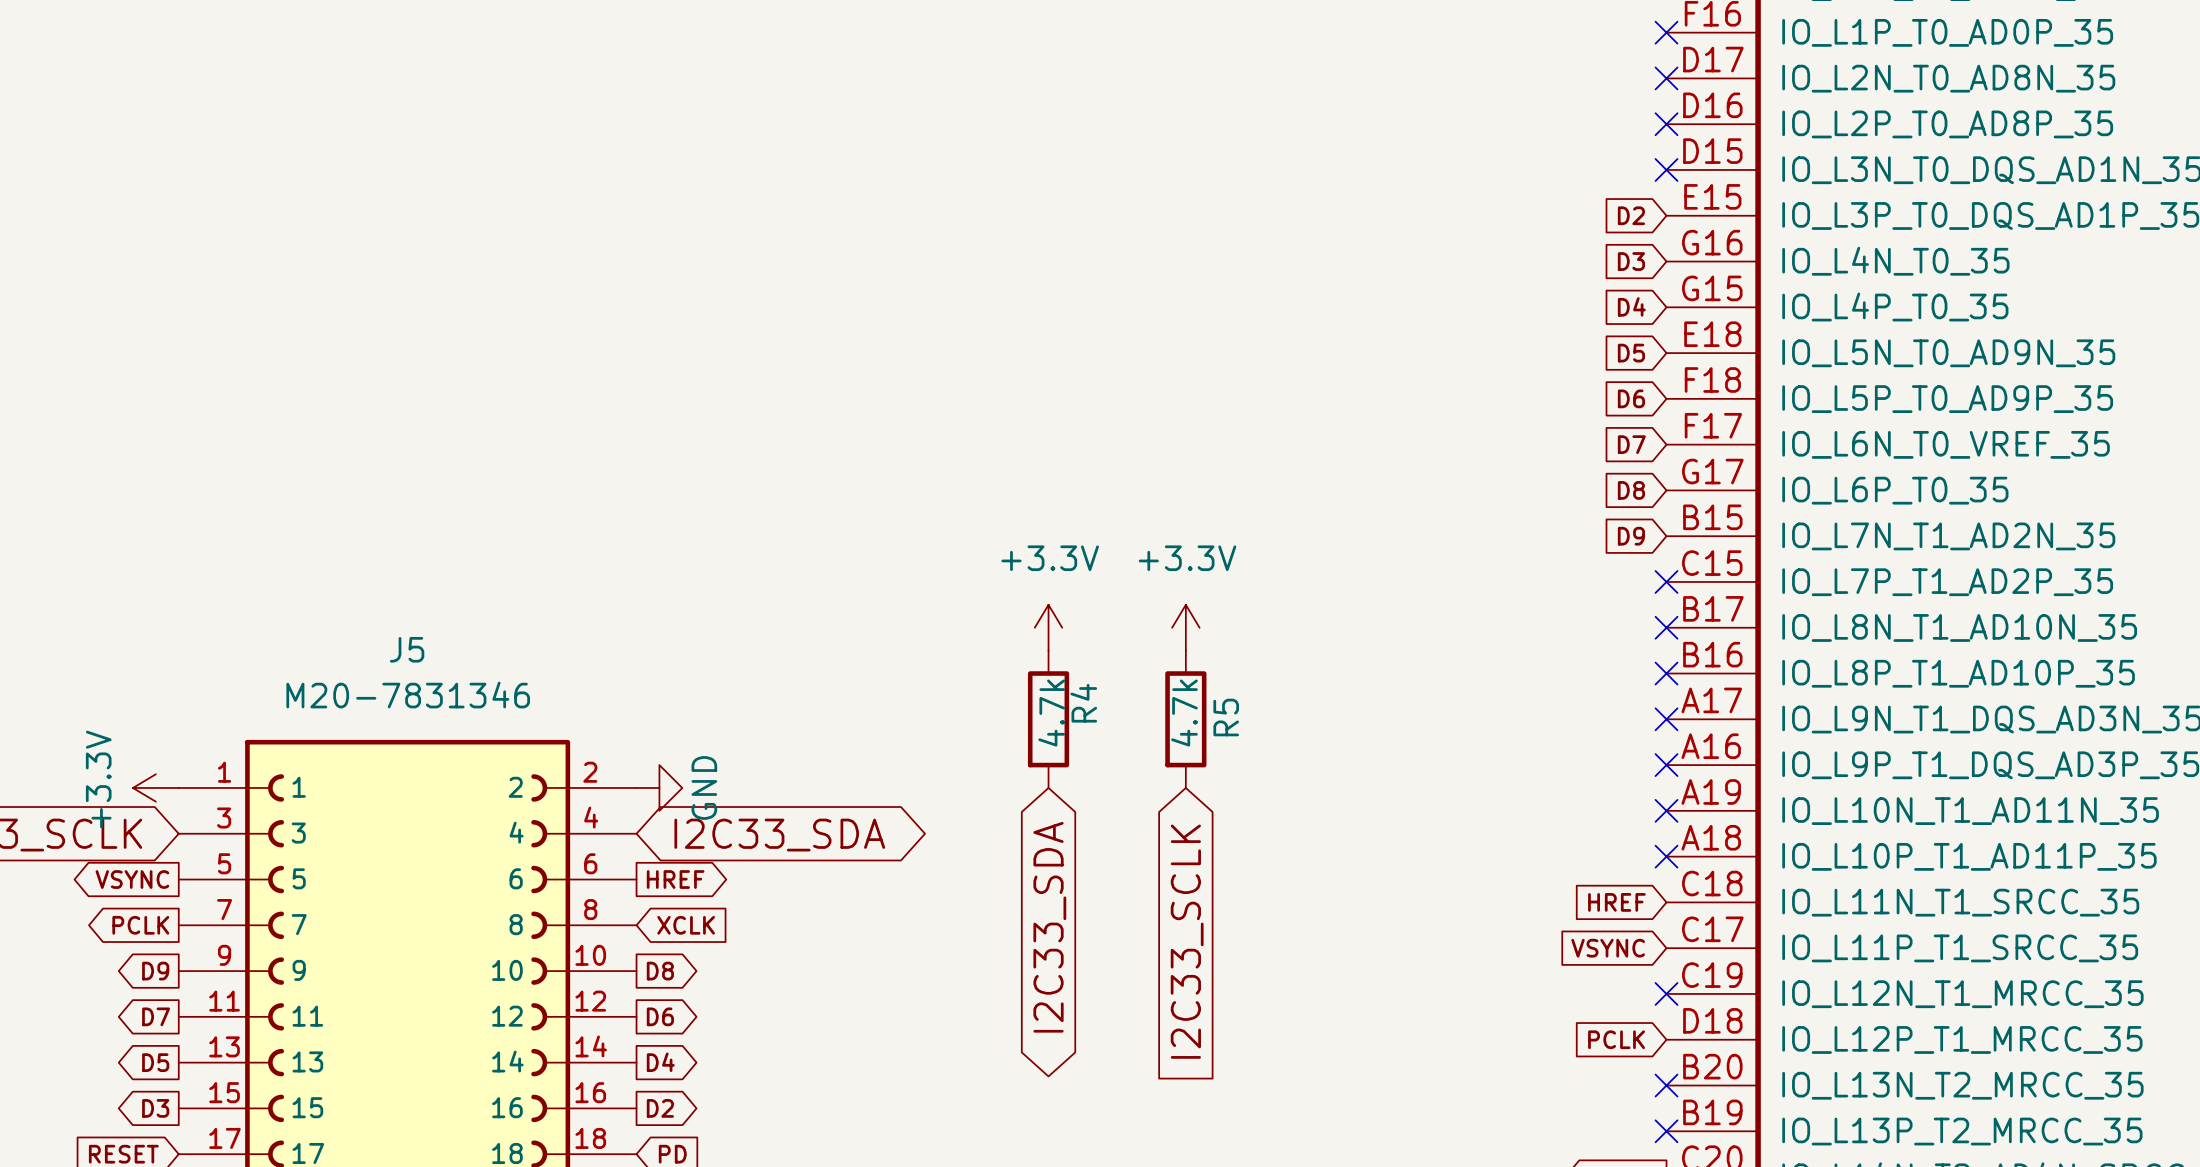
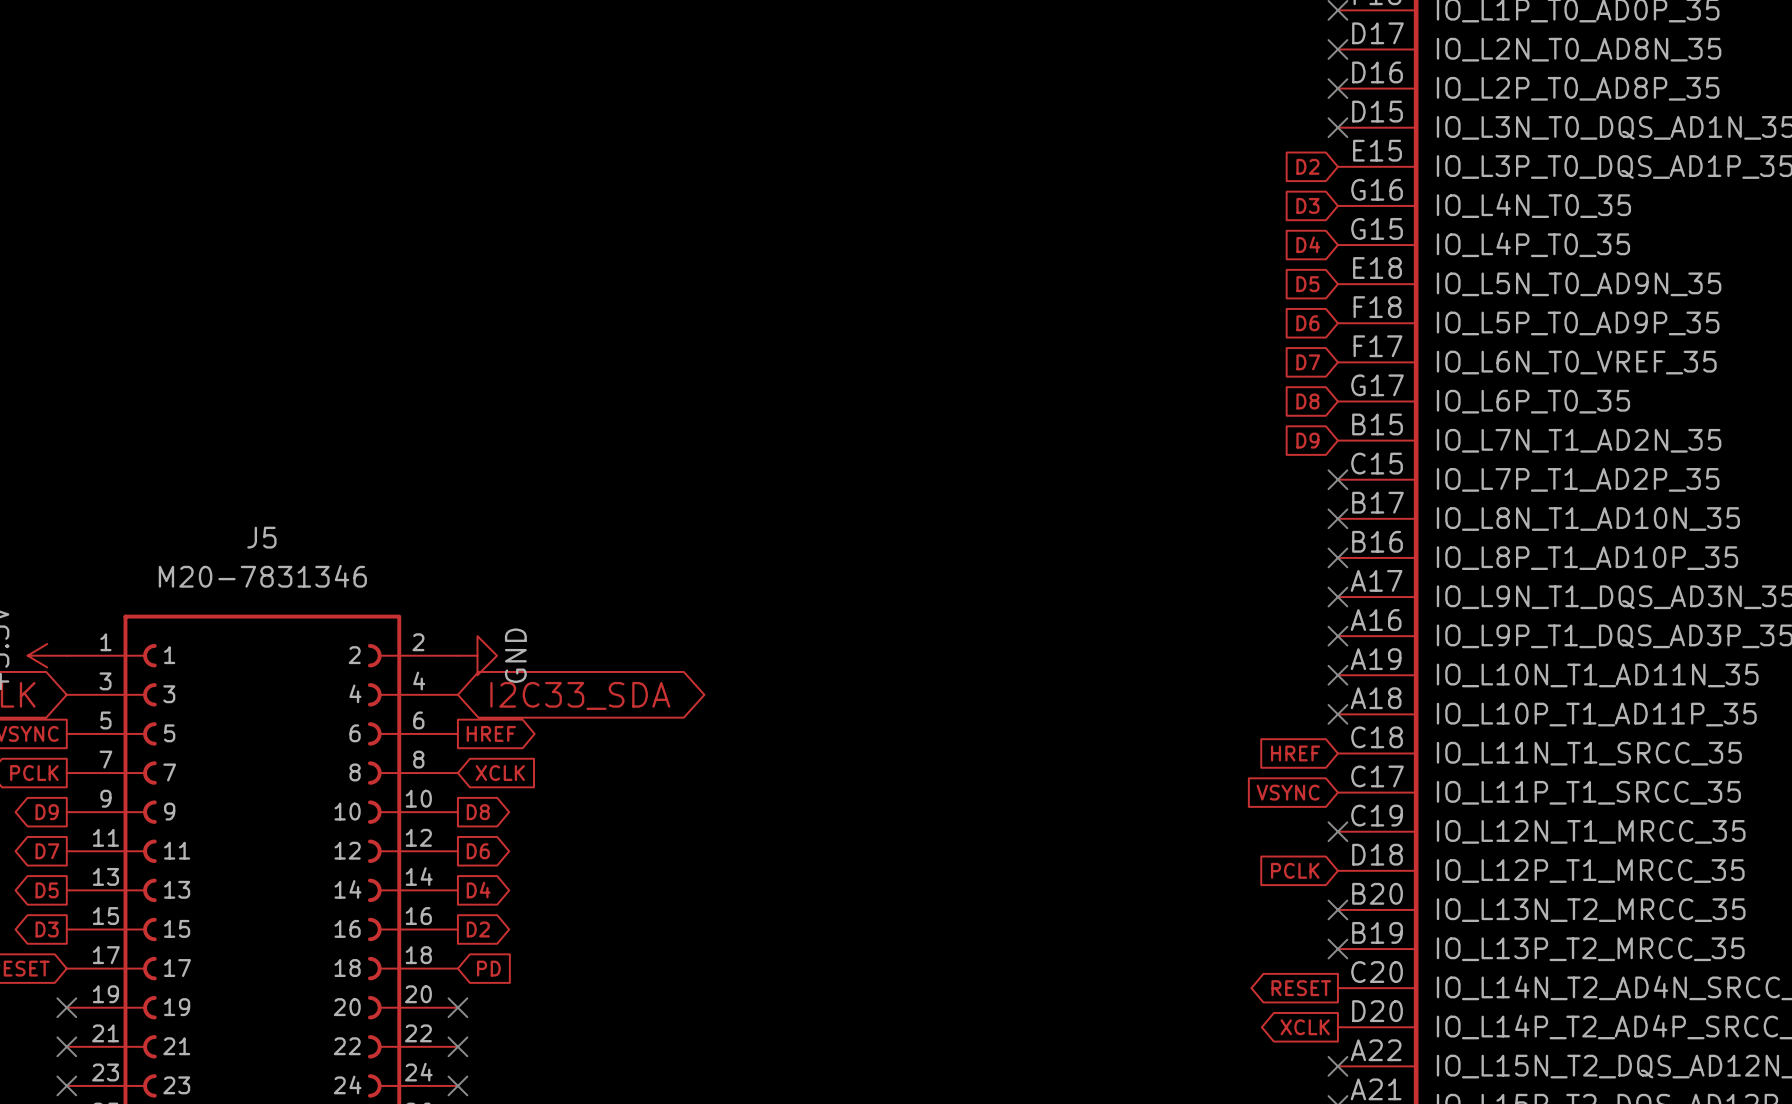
power symbol: +3.3V (1048, 627) -> none
power symbol: +3.3V (1185, 627) -> none
R4: 4.7k (1048, 719) -> none
R5: 4.7k (1185, 719) -> none
global label: I2C33_SDA (1049, 927) -> none
global label: I2C33_SCLK (1187, 941) -> none

